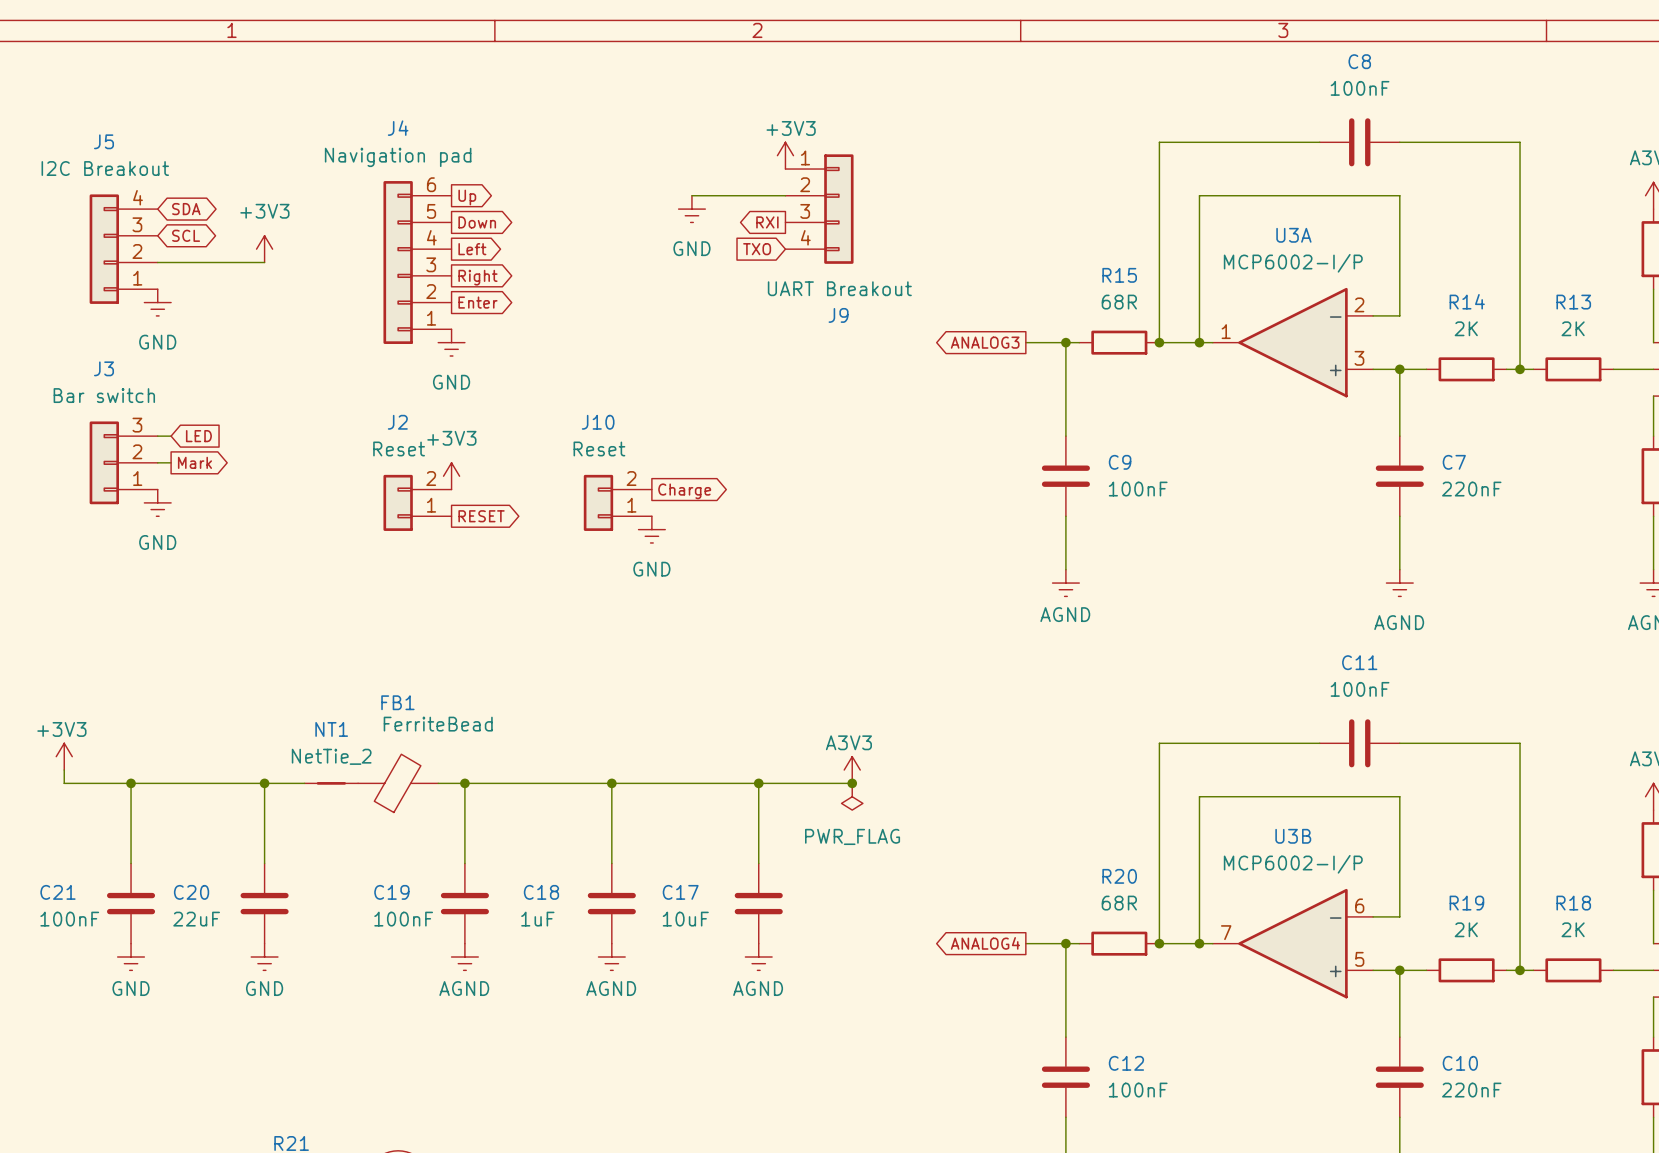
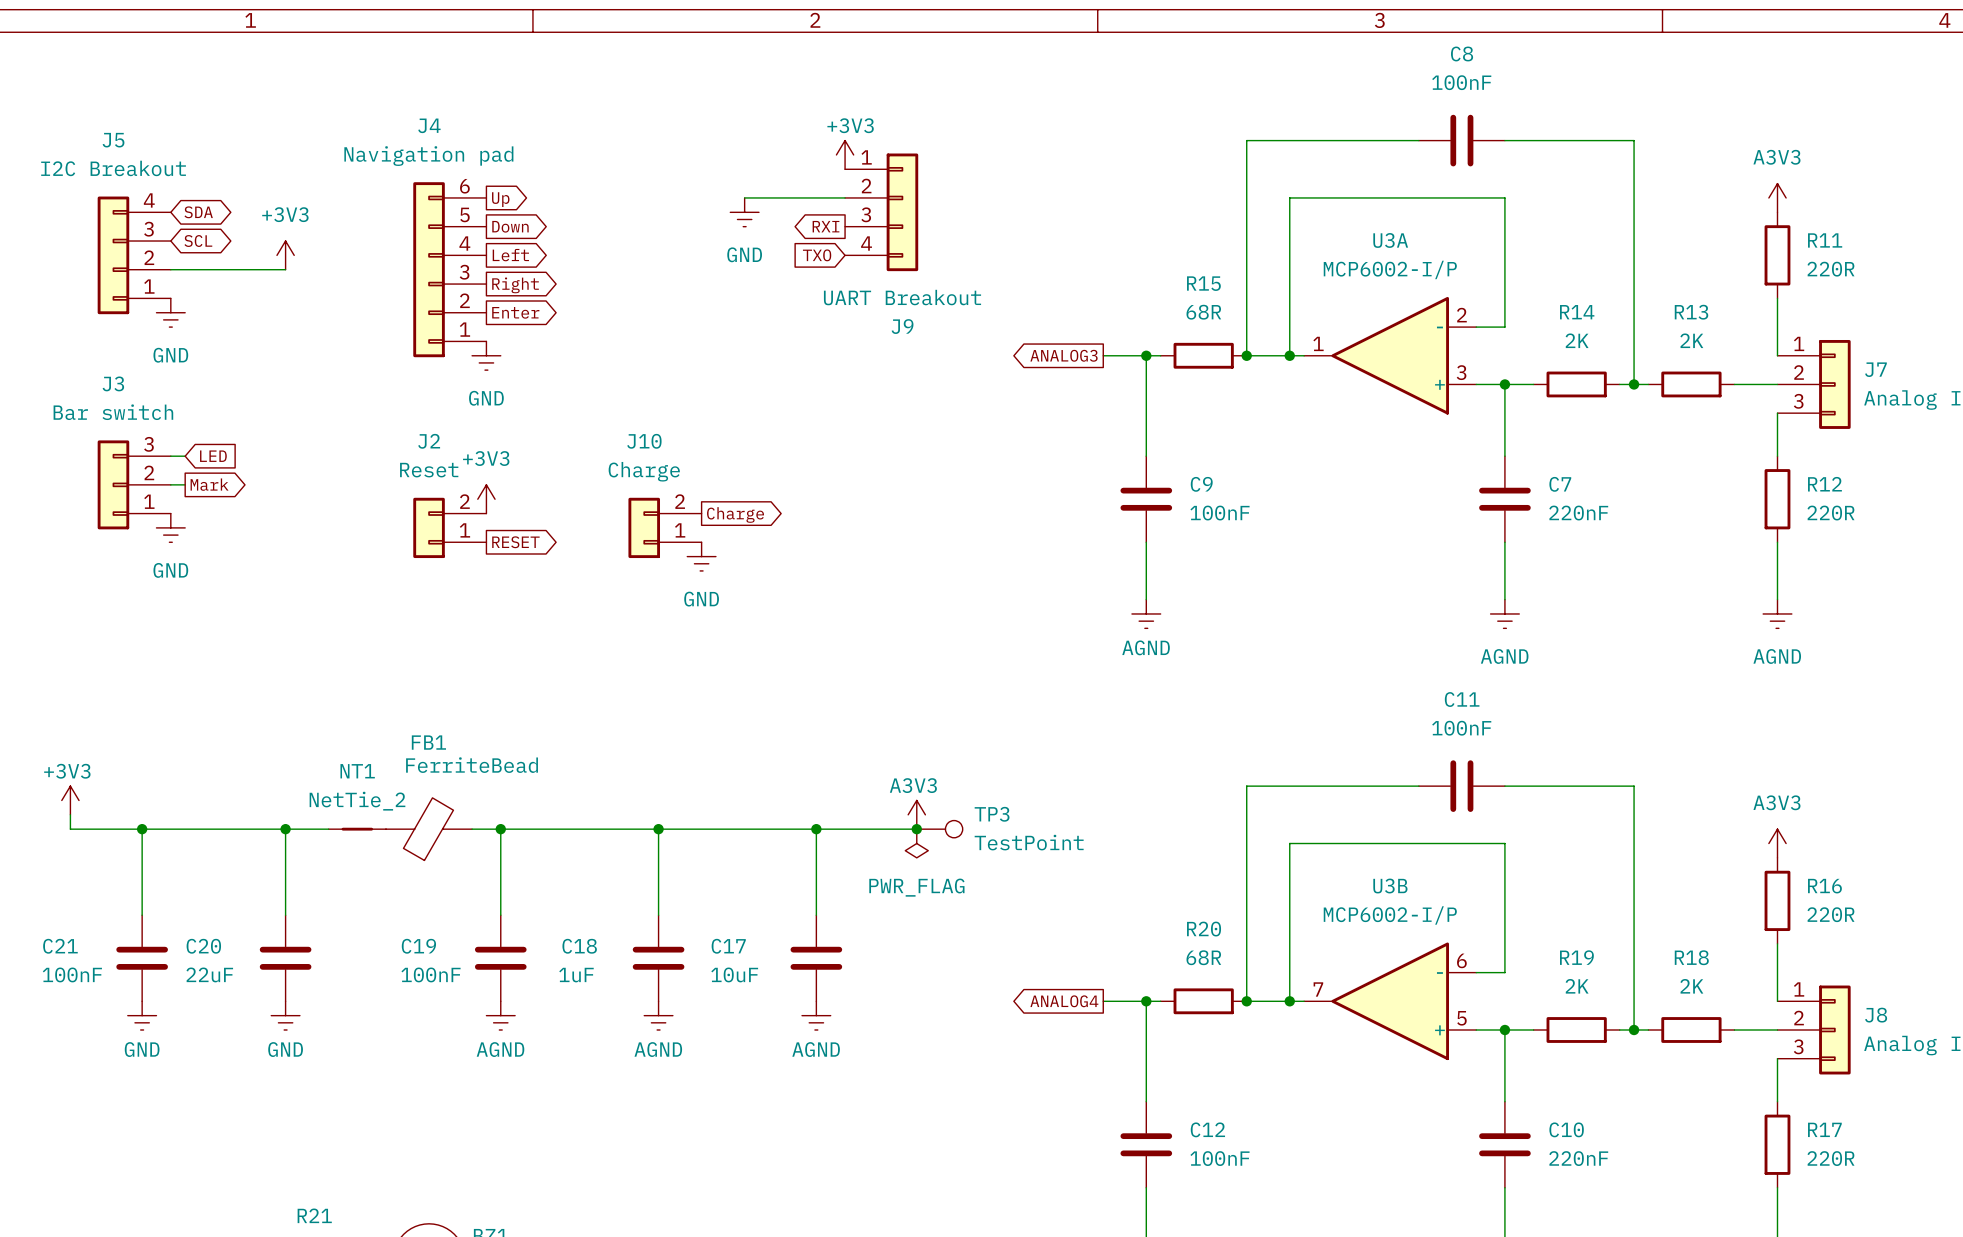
J10 value: Reset (599, 448) -> Charge (644, 471)
TP3: none -> TestPoint (939, 829)

